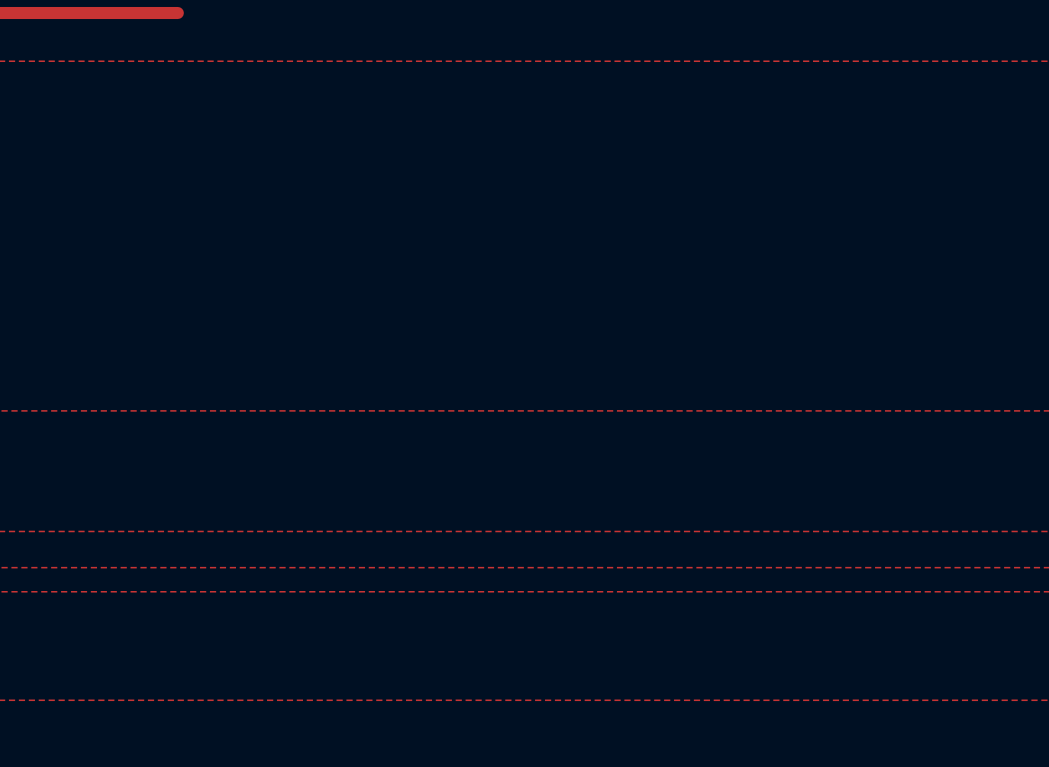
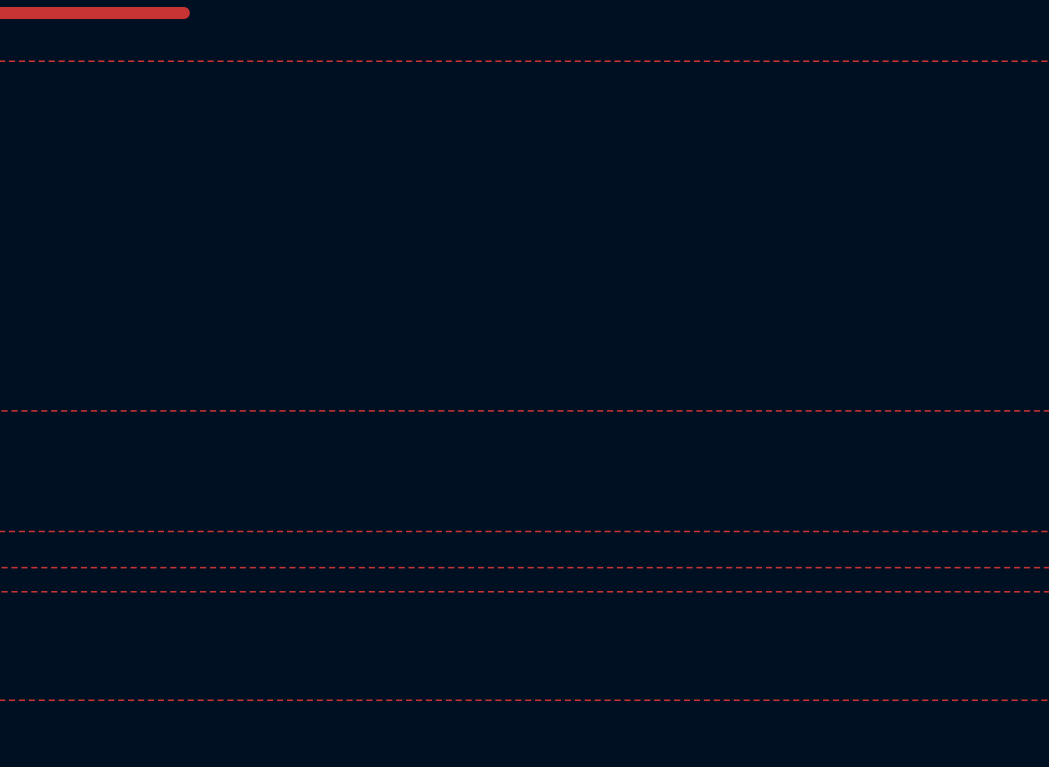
top track: none -> (177, 13) (183, 13)

